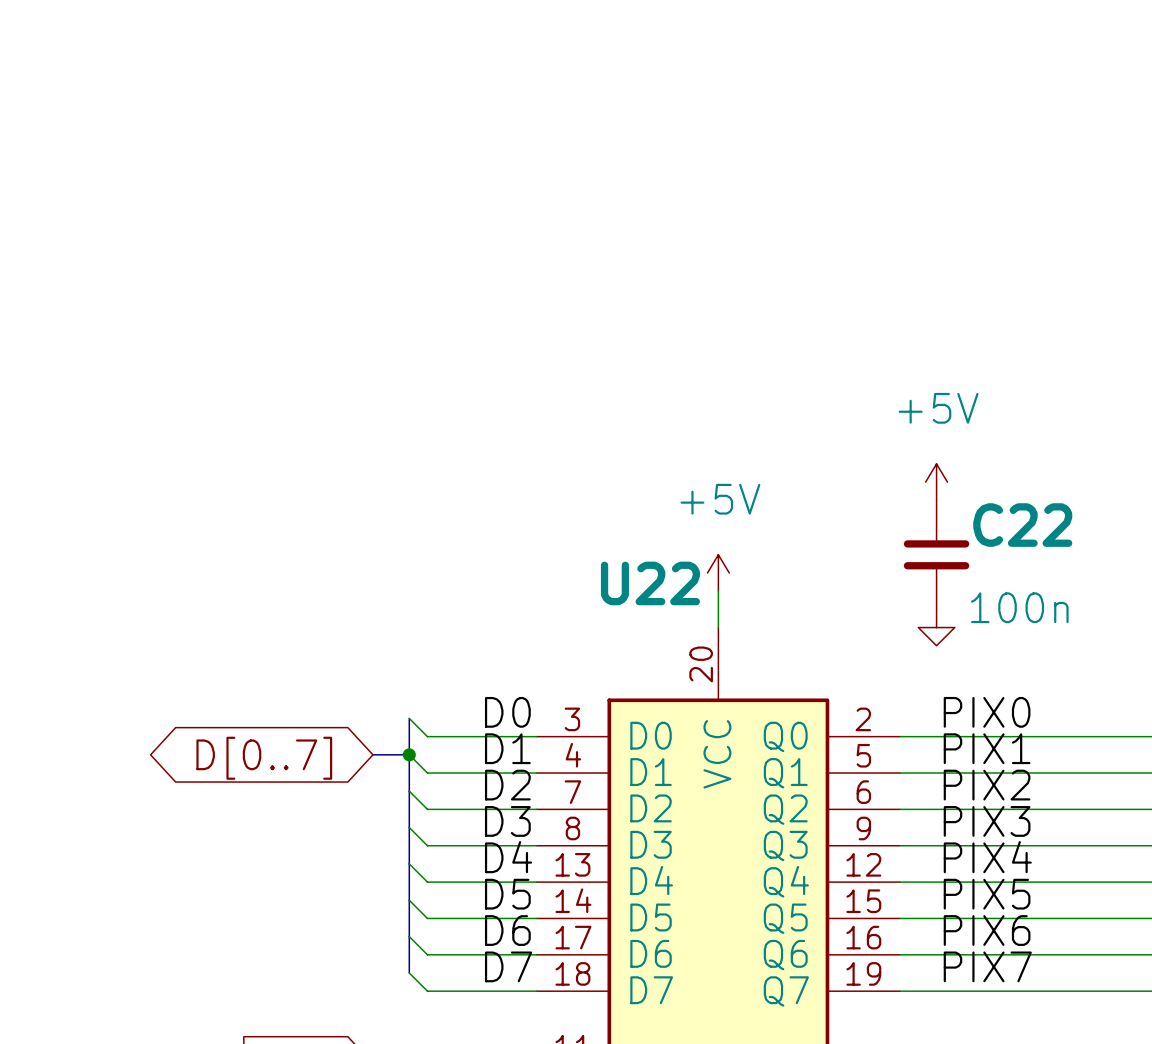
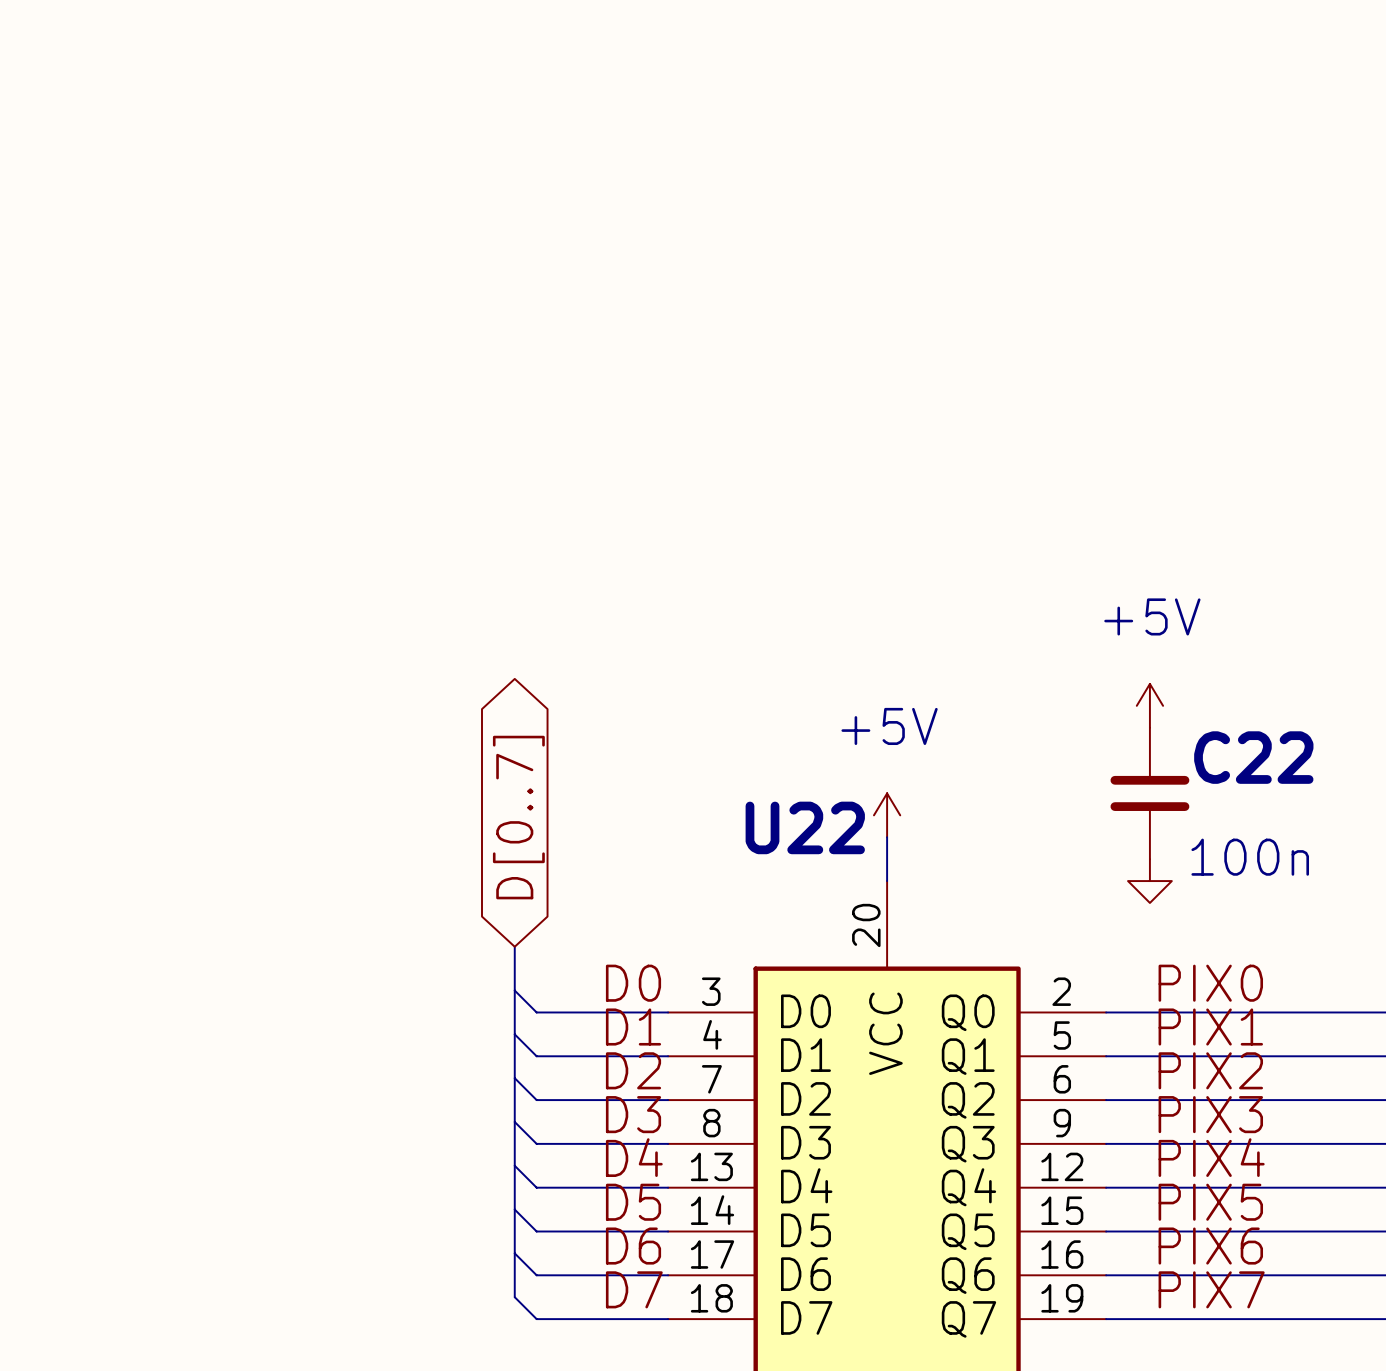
bus: none -> (514, 946) (514, 990)
bus: (372, 754) (409, 754) -> none
junction: (409, 754) -> none
global label rotation: 0° (264, 758) -> 90° clockwise (518, 817)
global label position: D[0..7] (264, 758) -> D[0..7] (518, 817)

